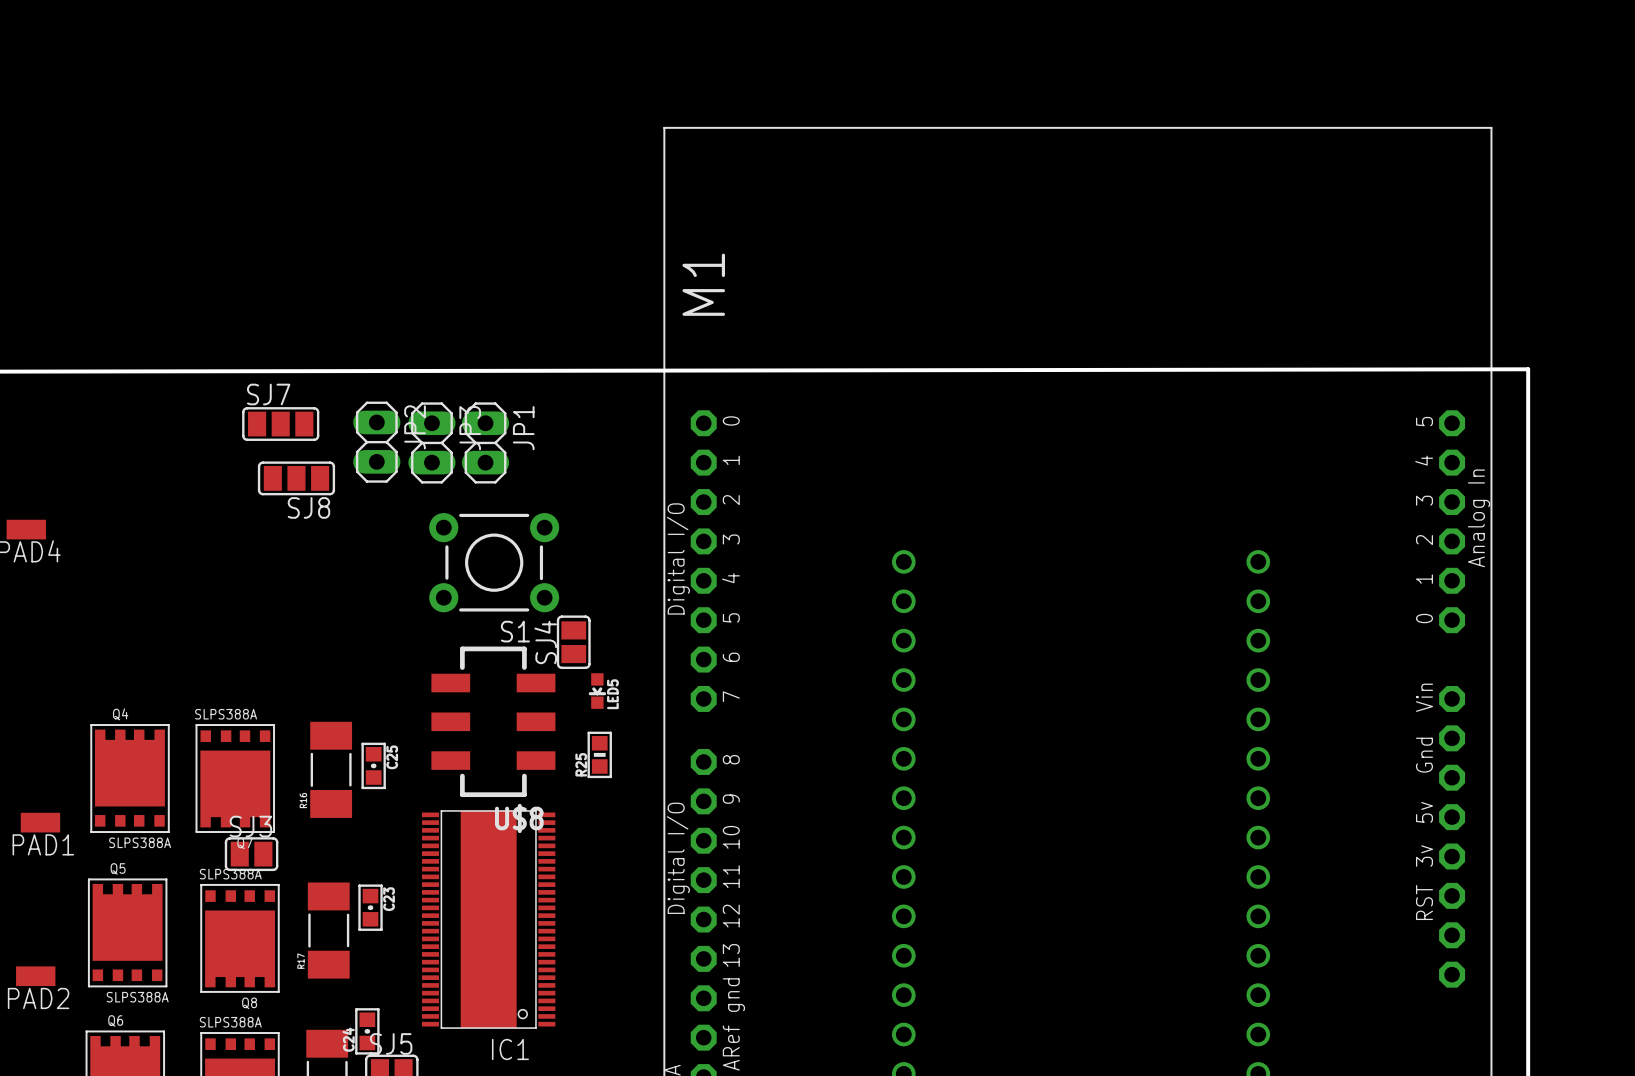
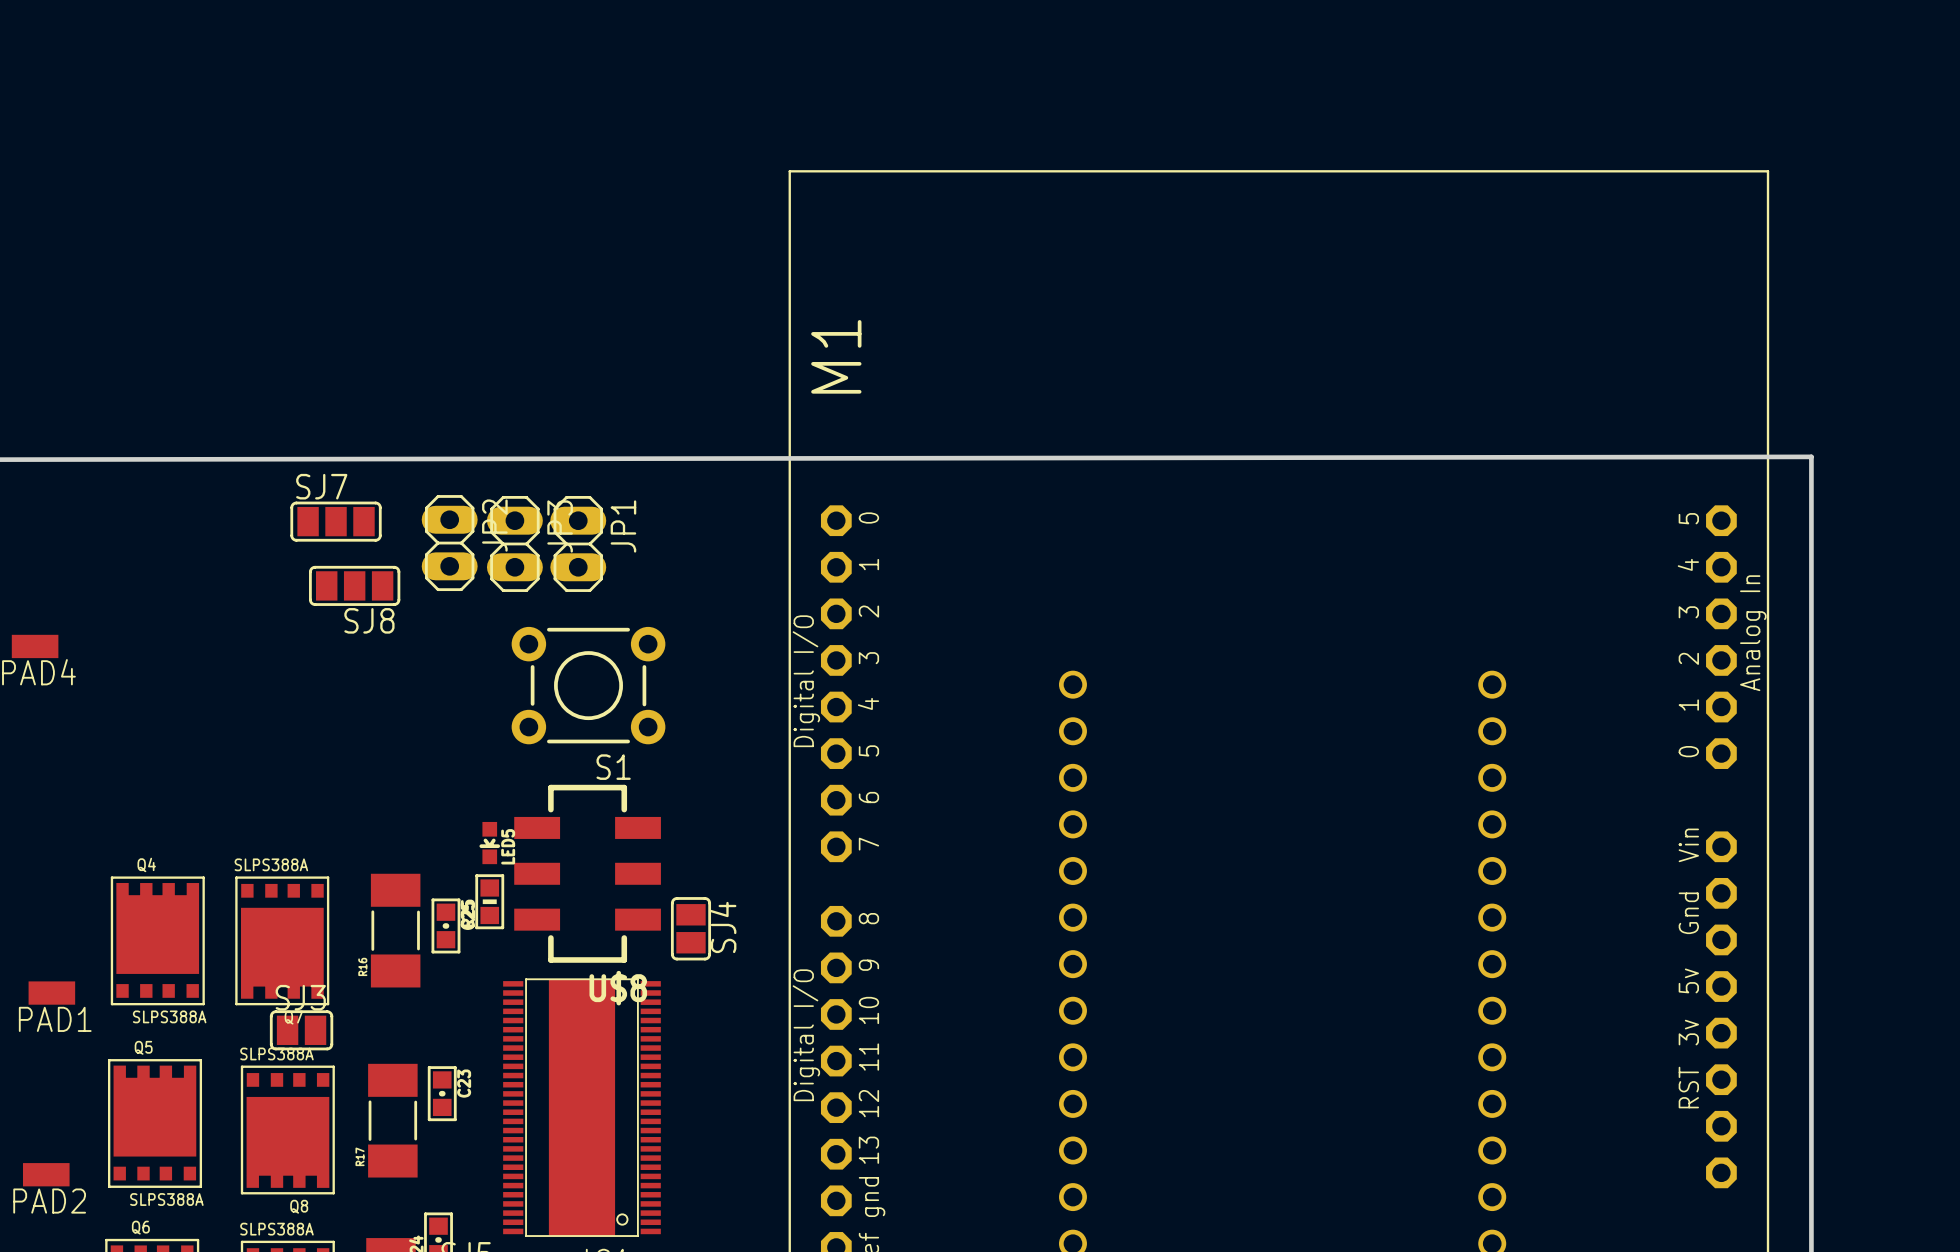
SJ4 name position: SJ4 (545, 642) -> SJ4 (723, 927)
SJ4 position: (573, 642) -> (690, 928)
LED5 position: (597, 691) -> (489, 843)
R25 position: (599, 754) -> (489, 901)

